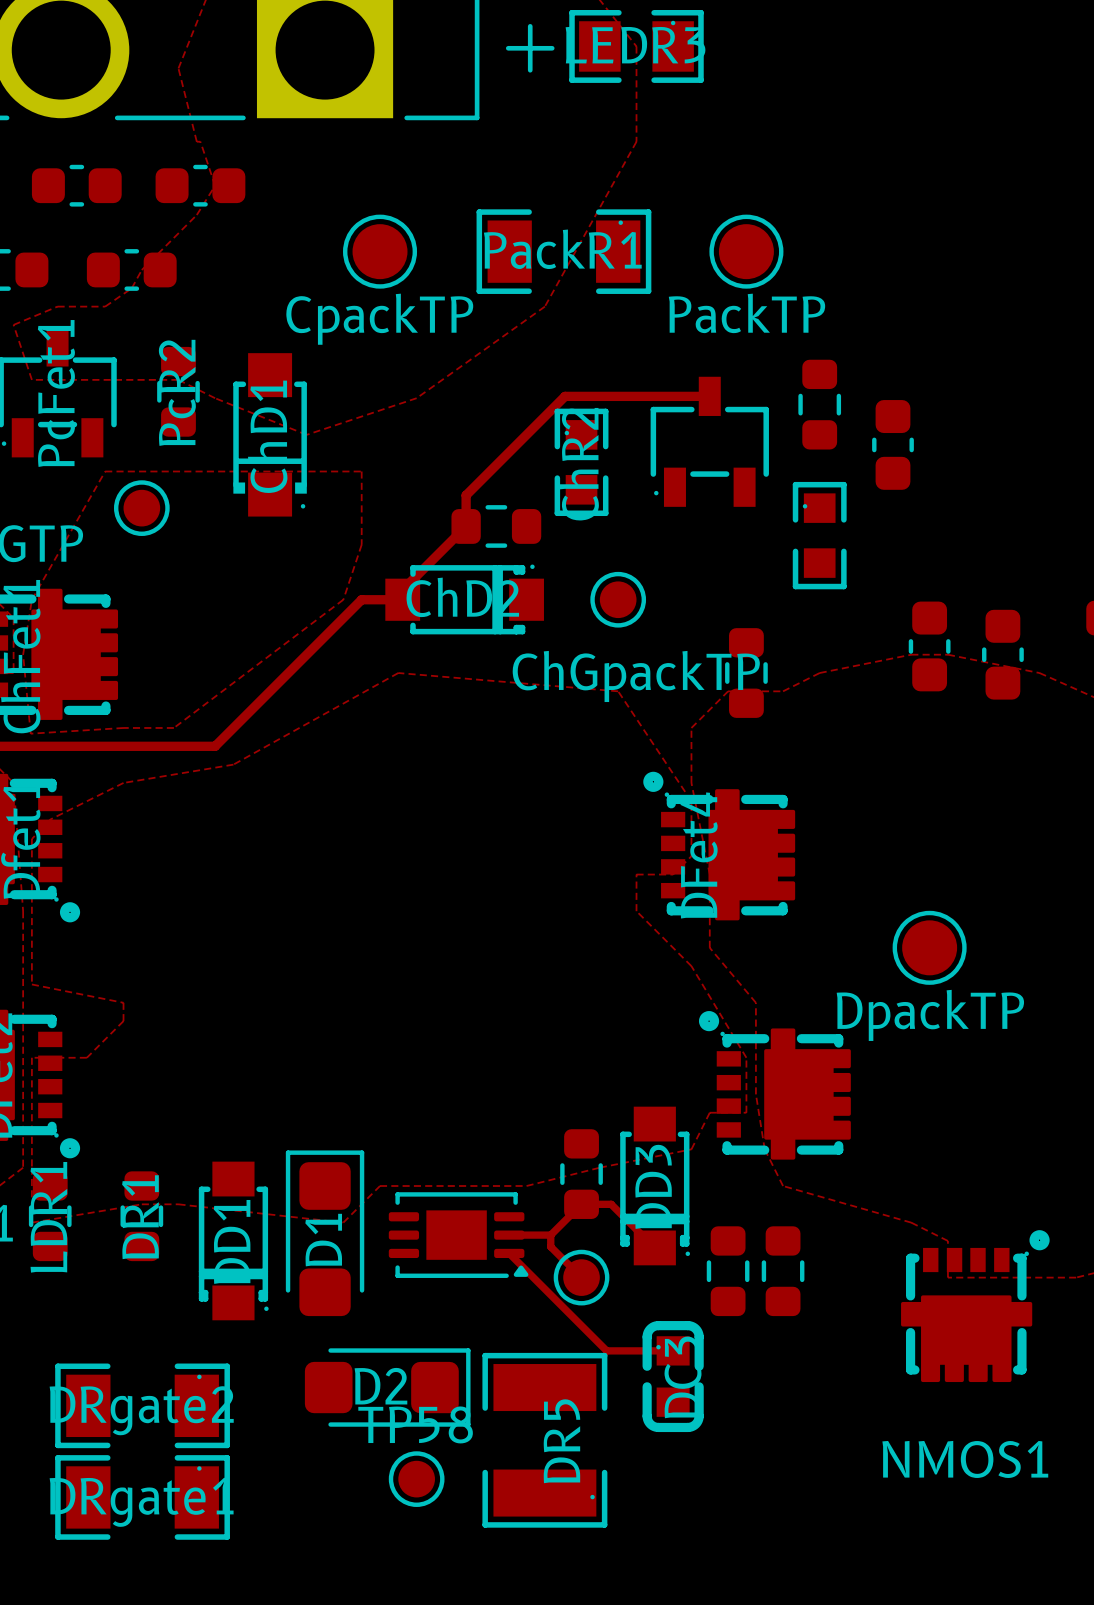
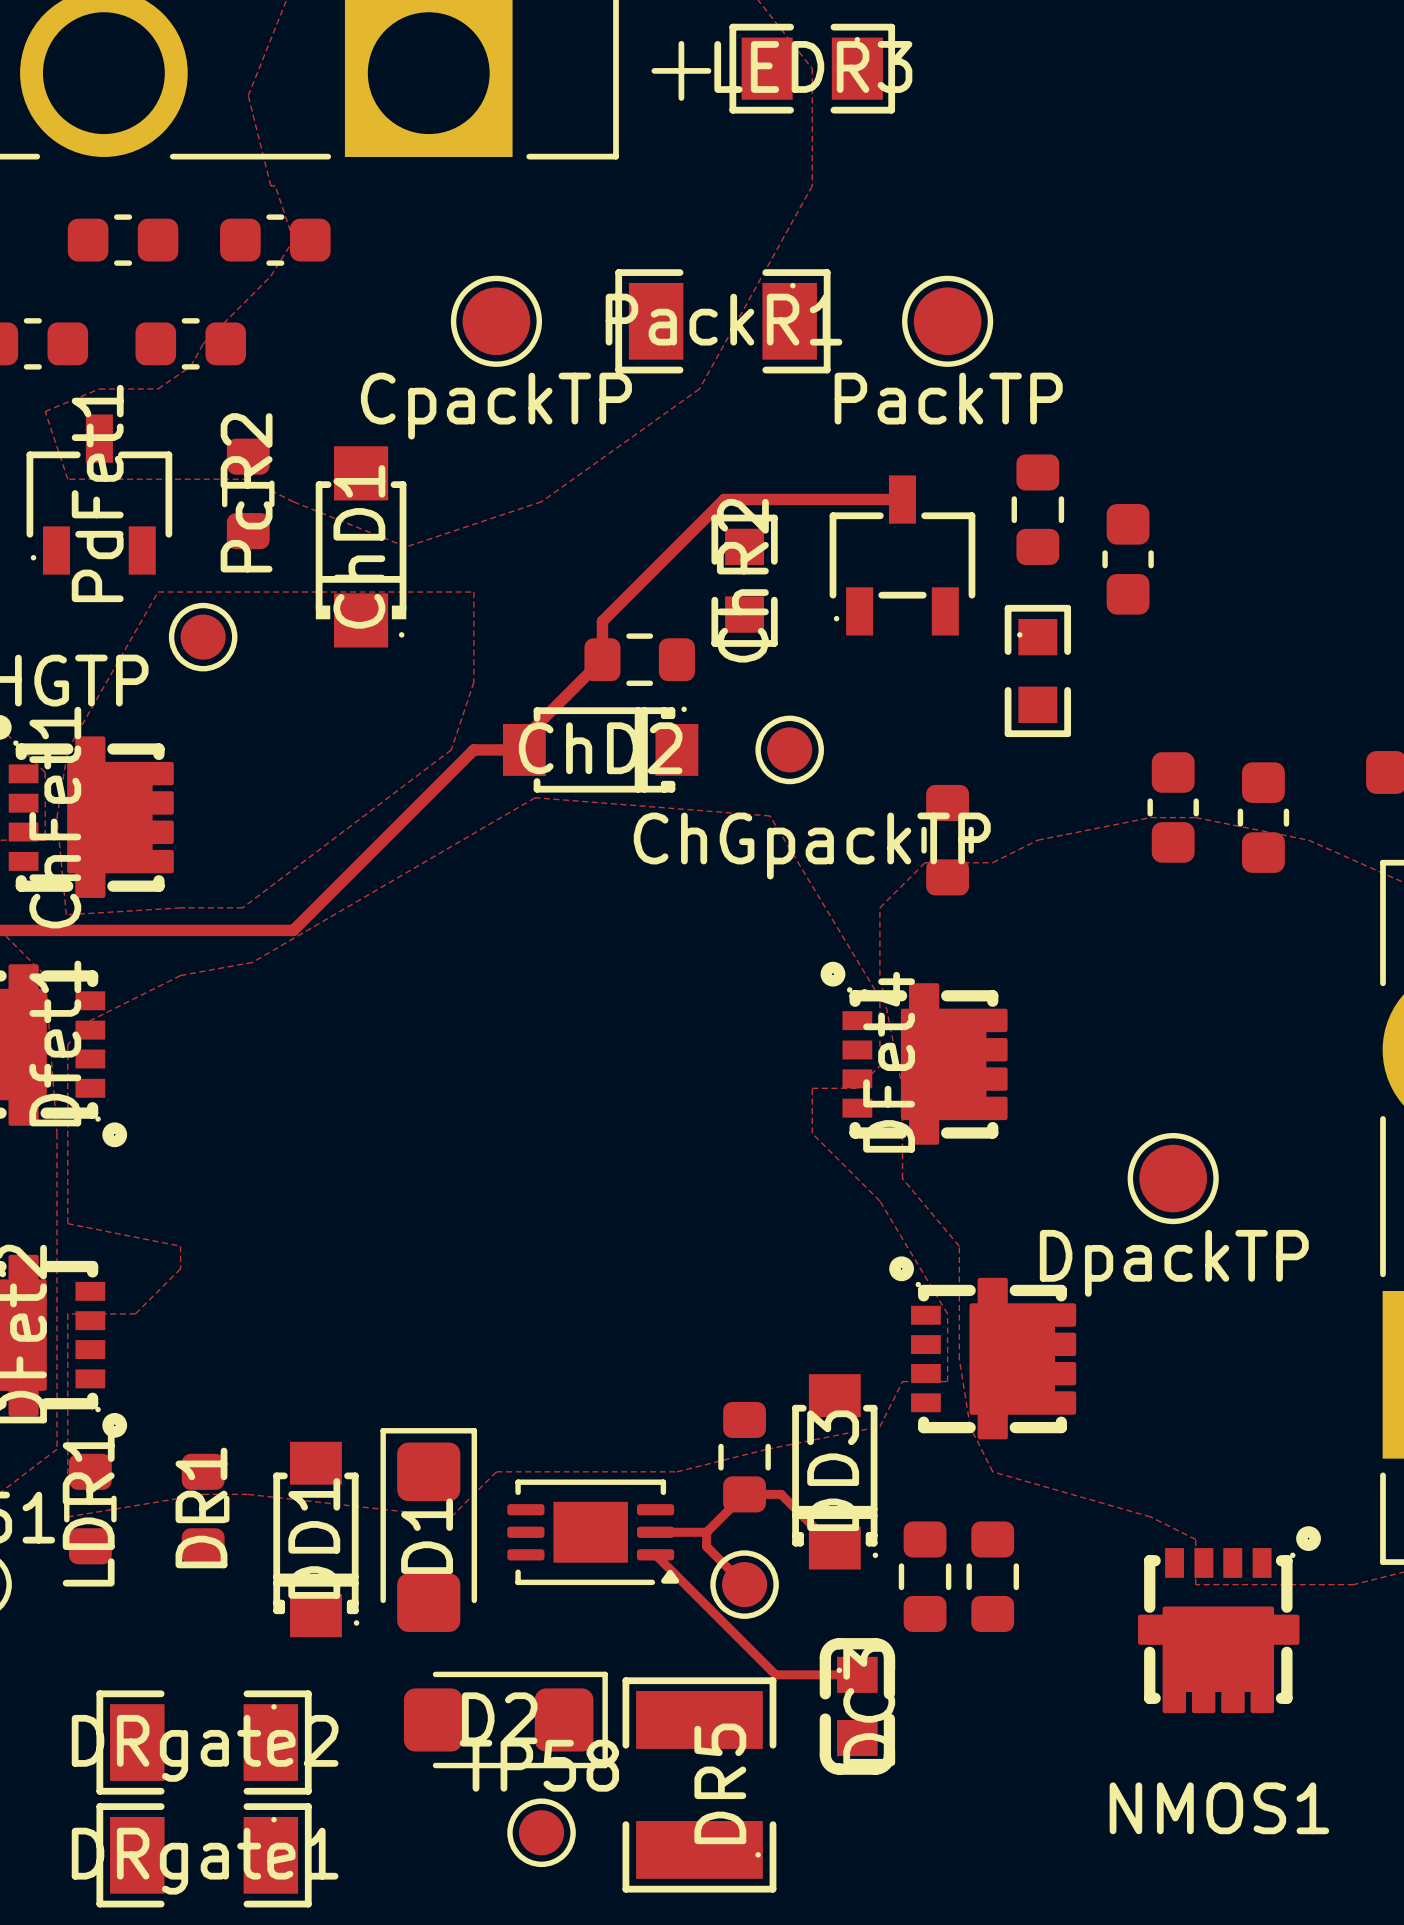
top zone outline: (123, 782) (233, 764) (398, 673) (618, 691) (691, 801) -> (180, 975) (252, 962) (535, 797) (770, 815) (879, 998)

